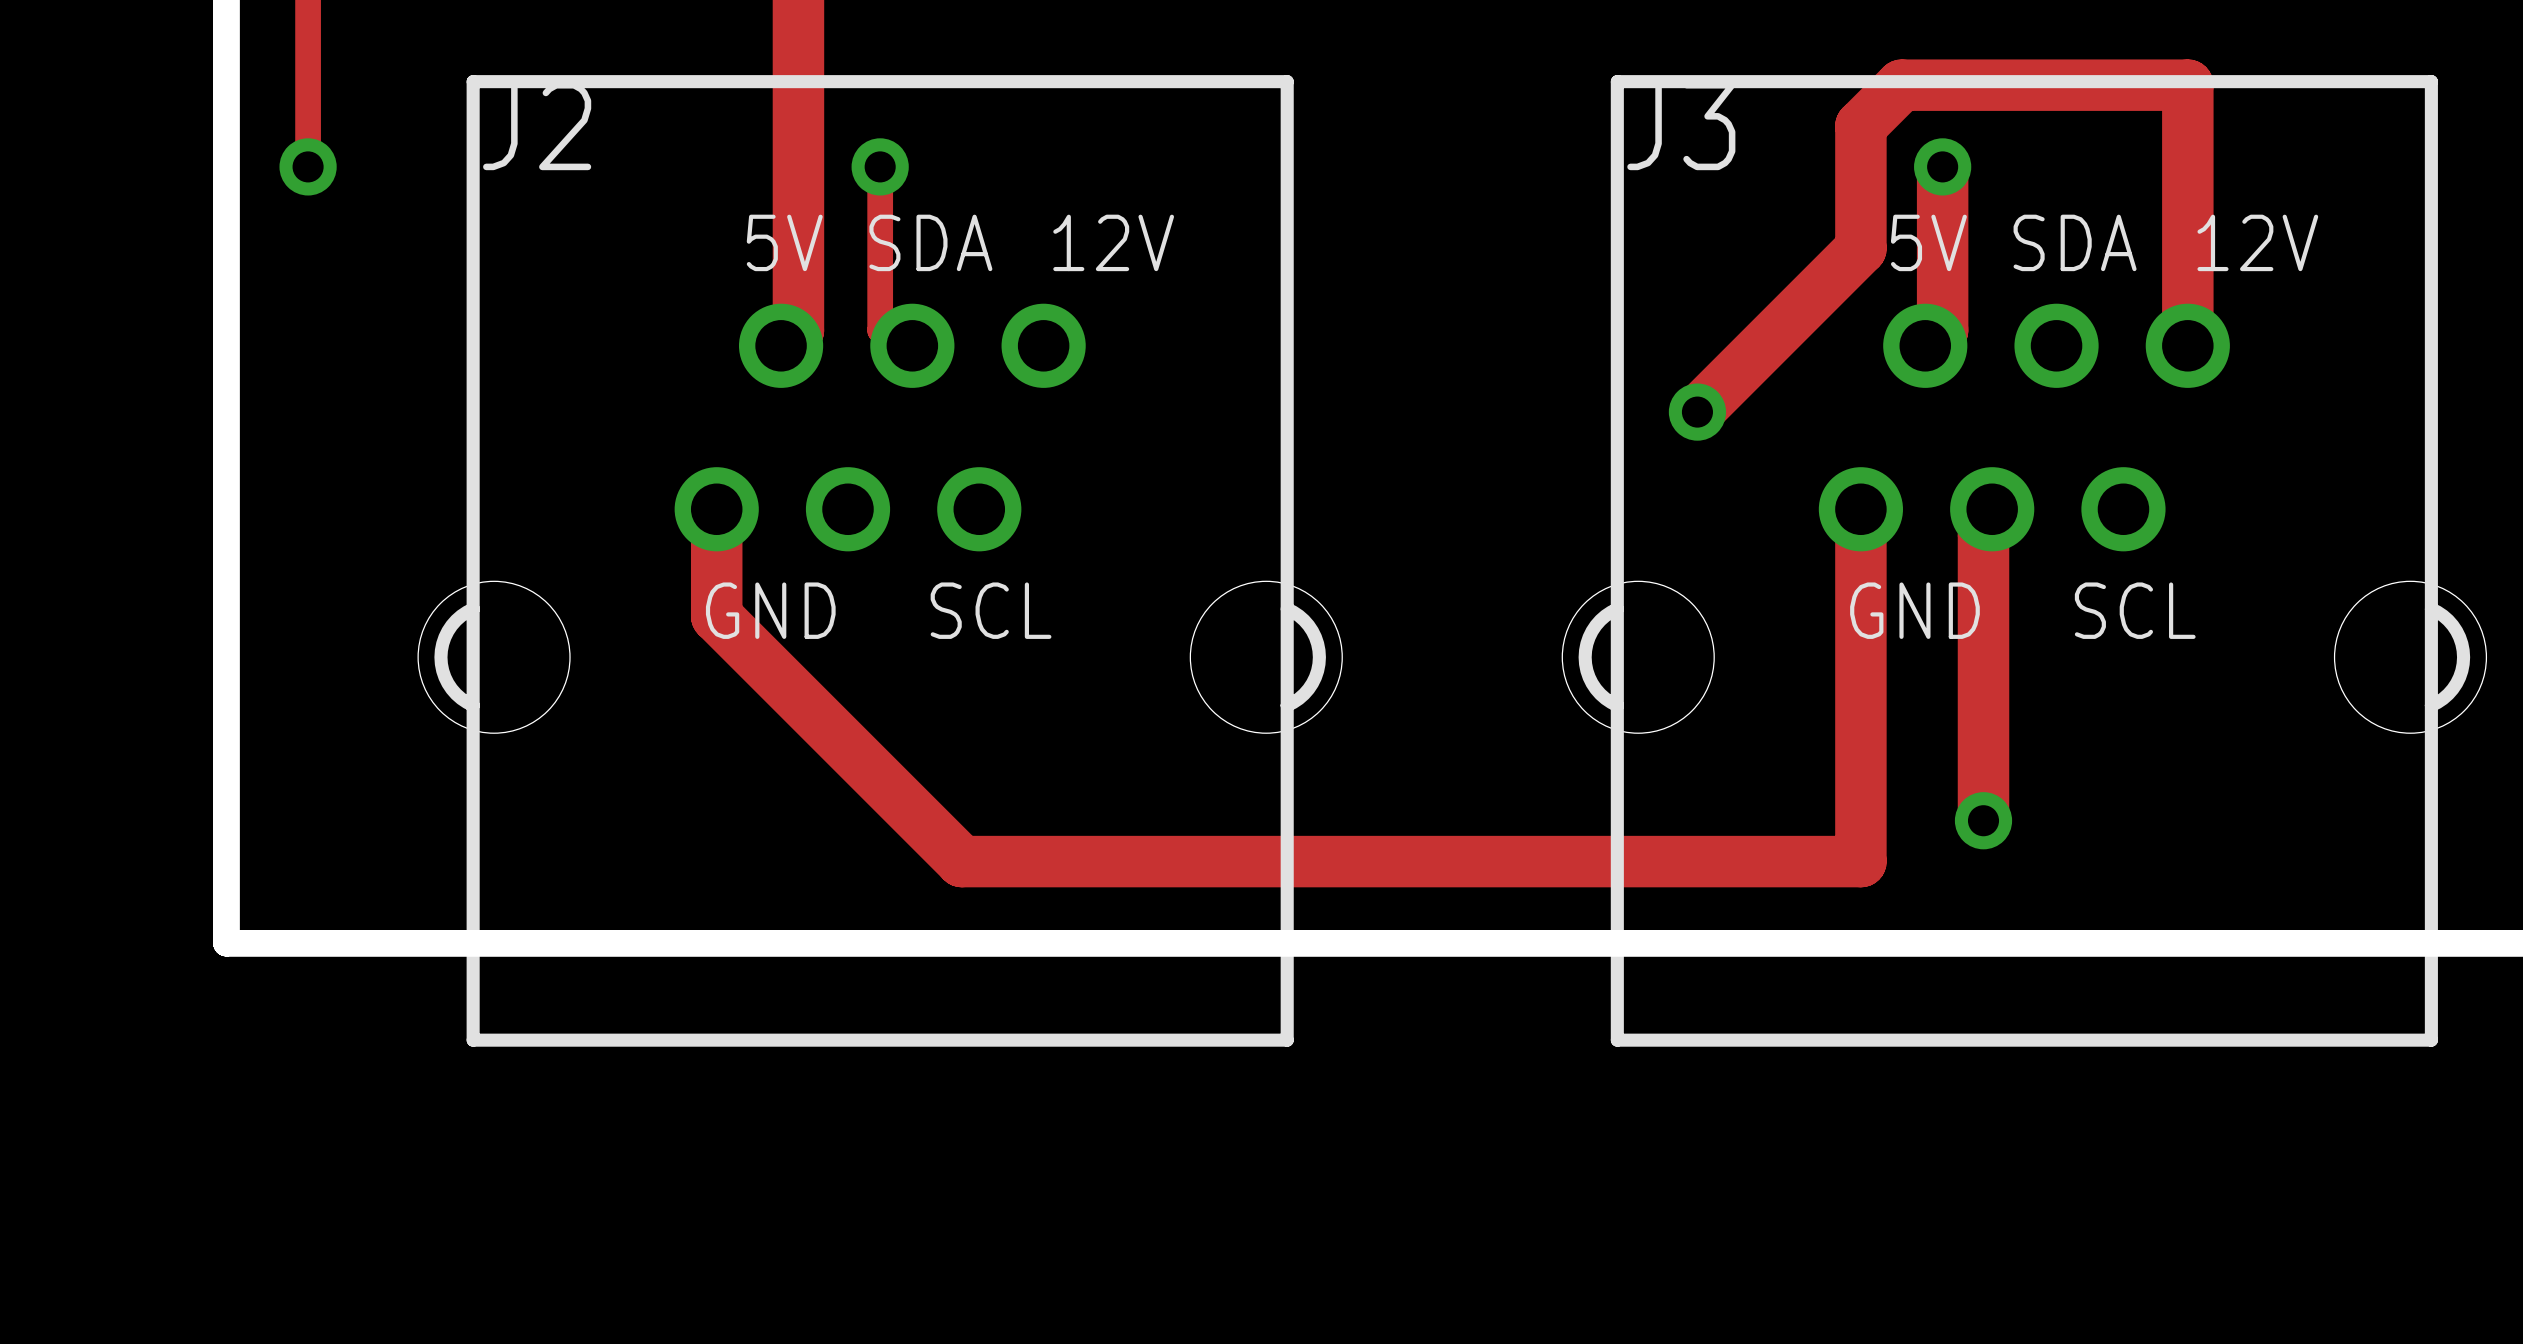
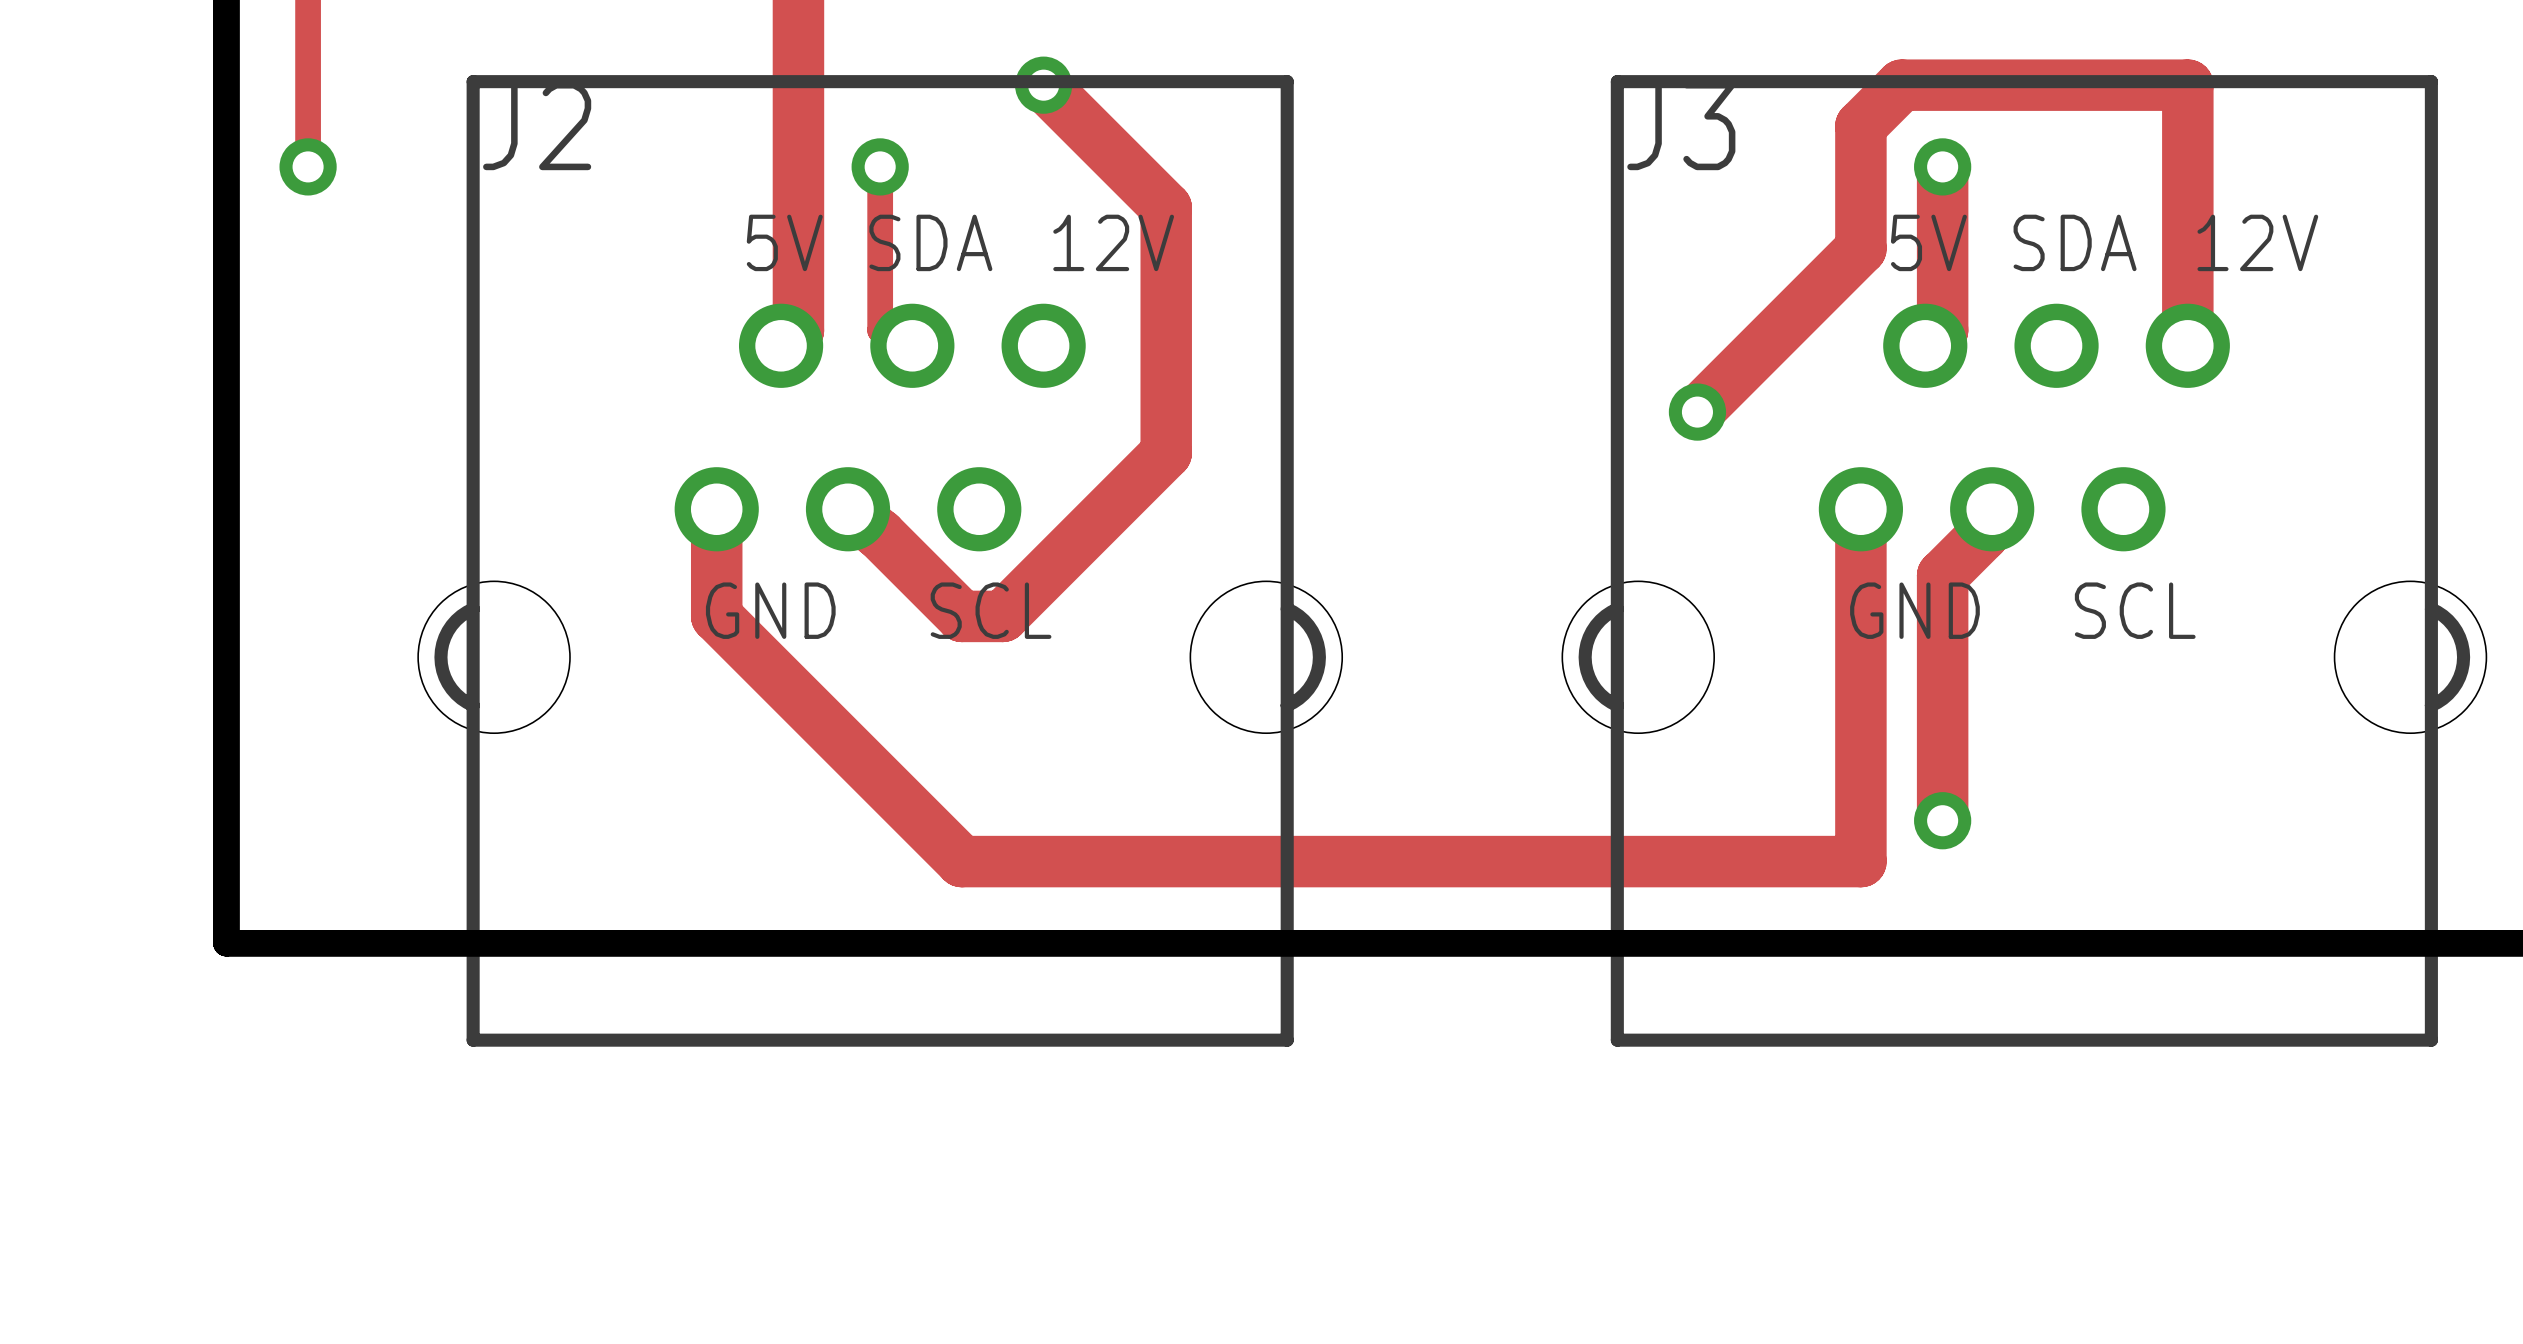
track: none -> (1043, 85) (1166, 207) (1166, 452) (1002, 616) (961, 616) (880, 534) (848, 509)
via: none -> (1043, 85)
track: (1983, 534) (1983, 820) -> (1983, 534) (1942, 575) (1942, 820)
via position: (1983, 820) -> (1942, 820)

